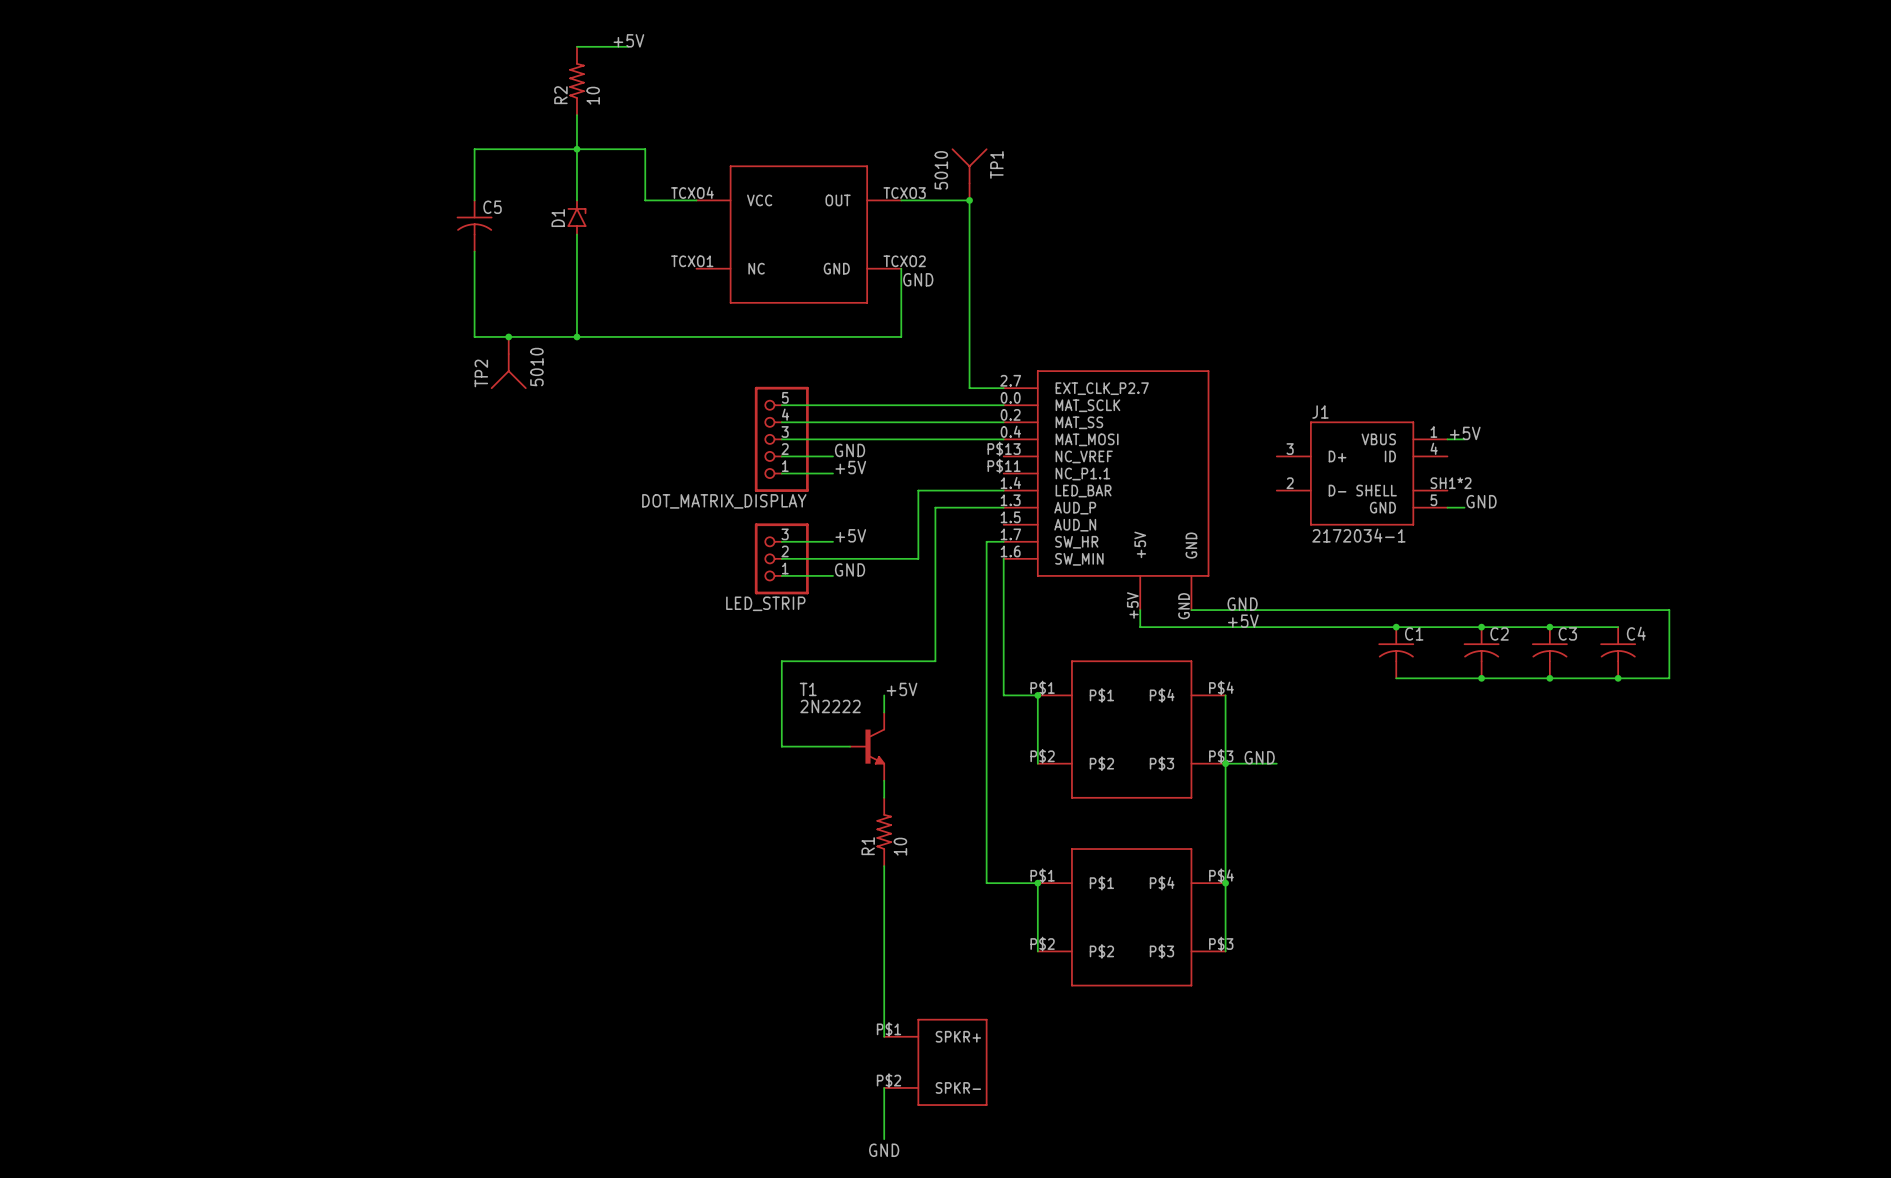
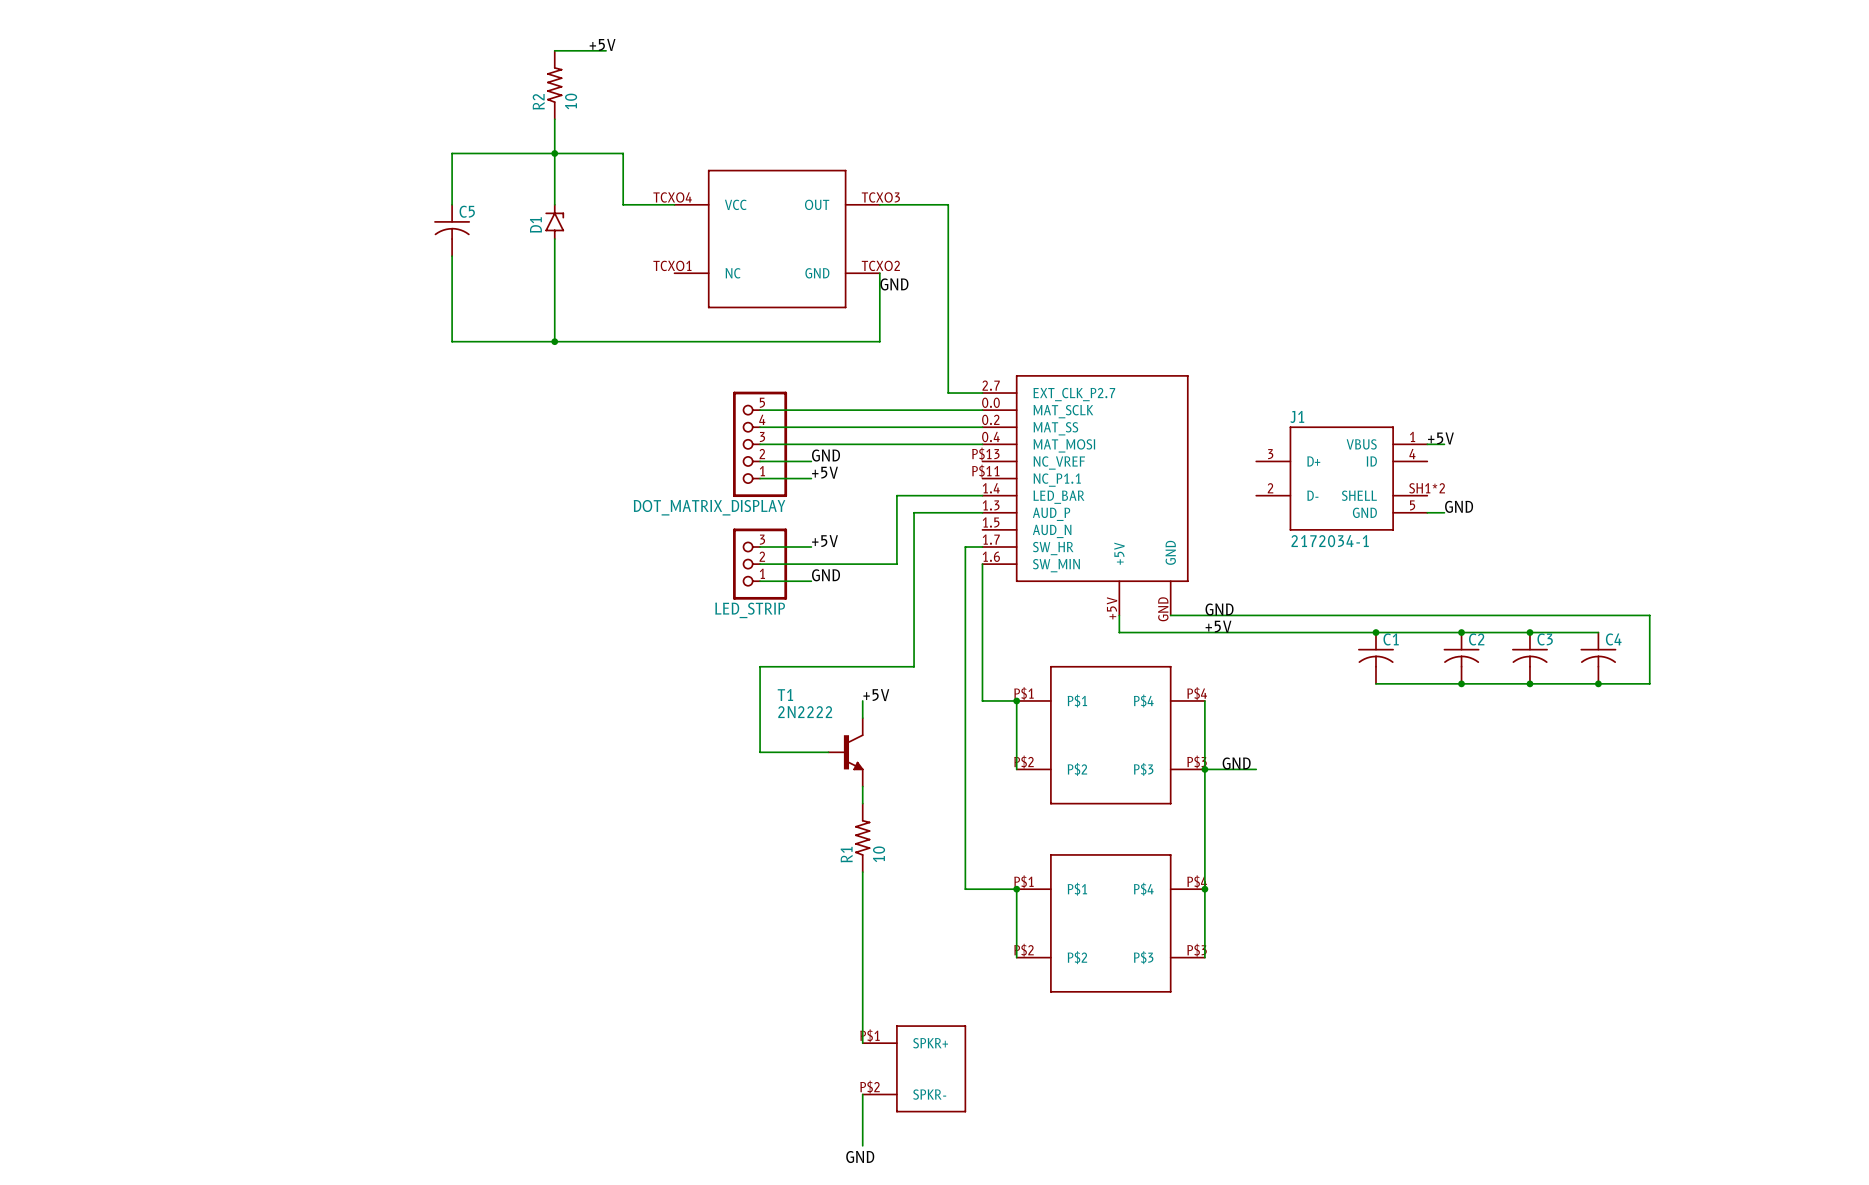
TP1: 5010 (969, 174) -> none
junction: (969, 200) -> none
junction: (508, 336) -> none
TP2: 5010 (508, 363) -> none

